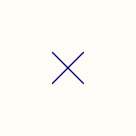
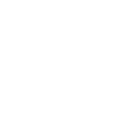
no-connect mark: (67, 67) -> none

